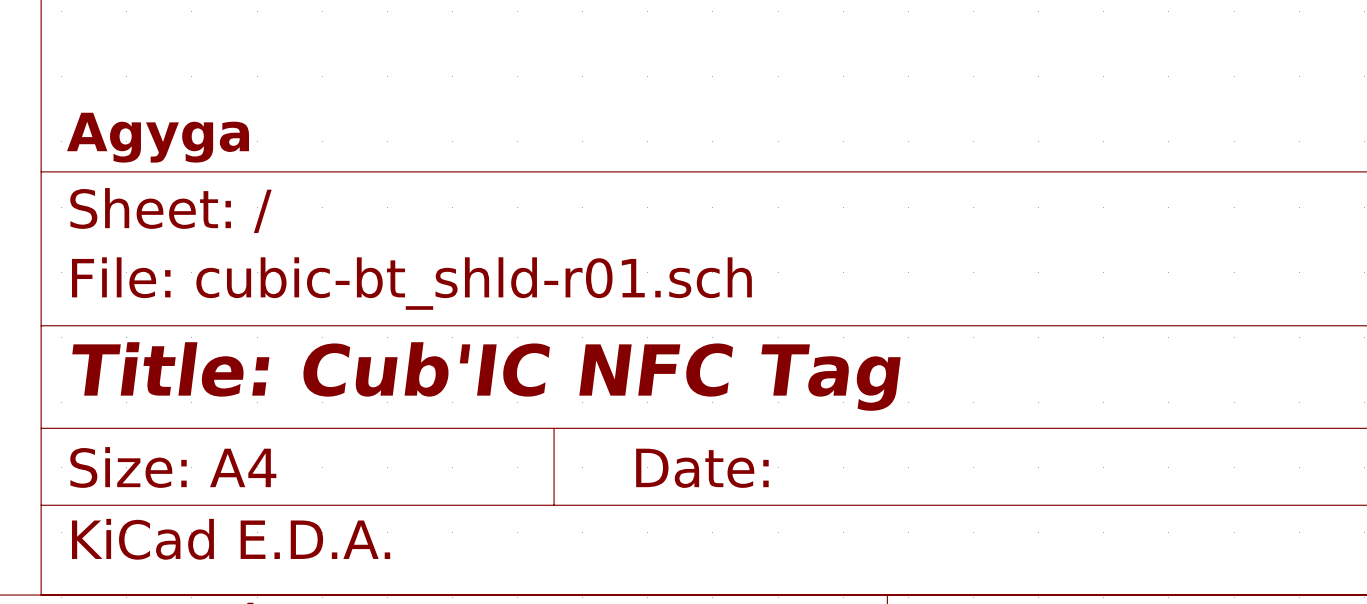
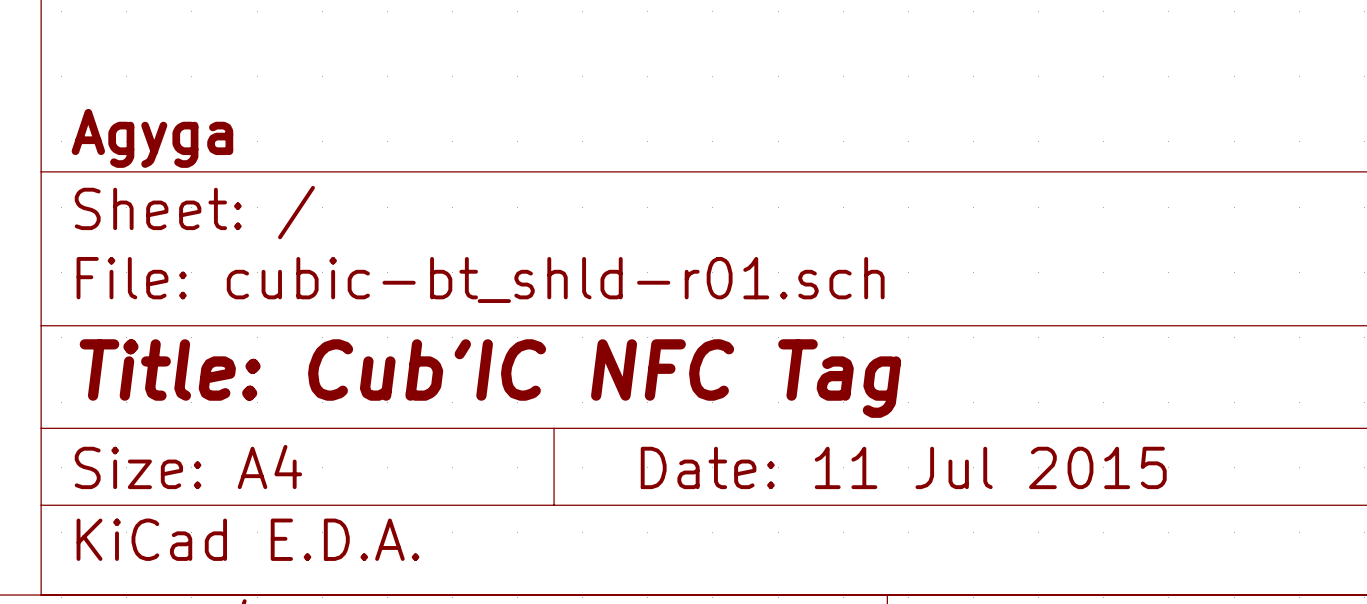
title block: Date: (702, 468) -> Date: 11 Jul 2015 (903, 467)

